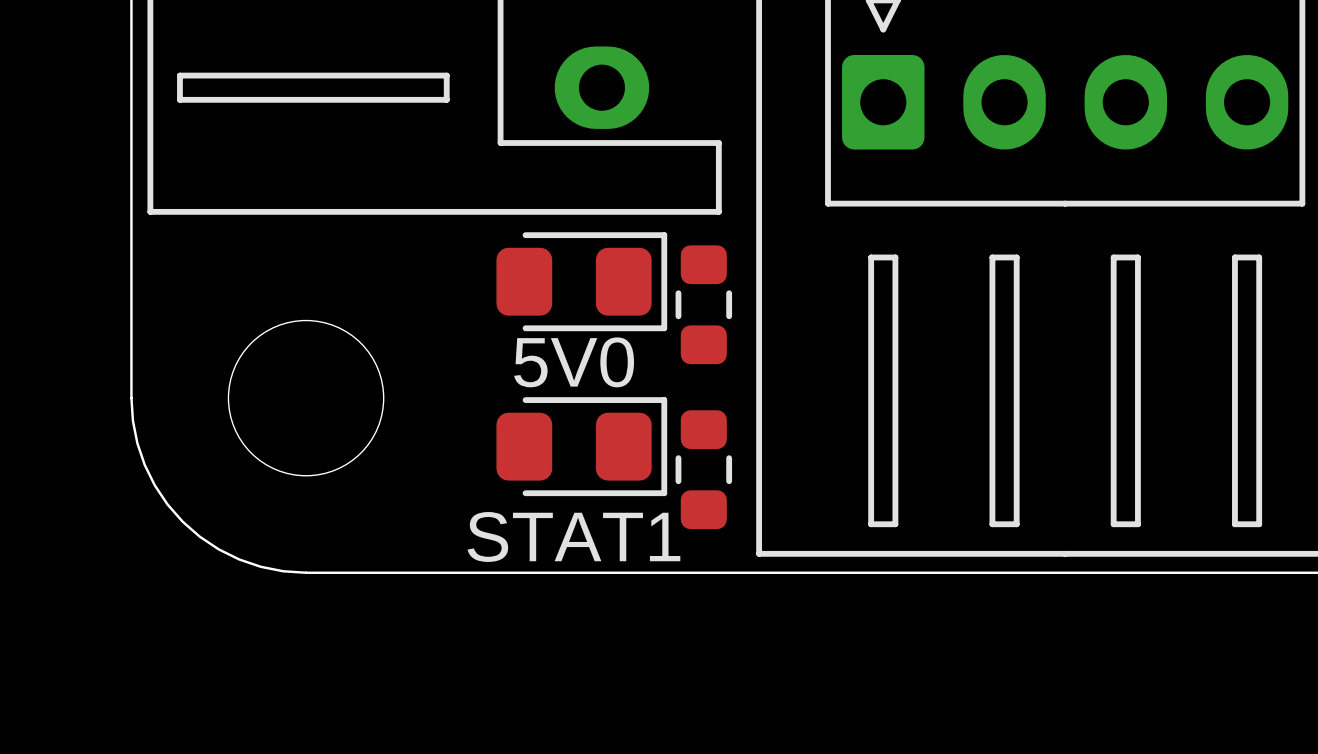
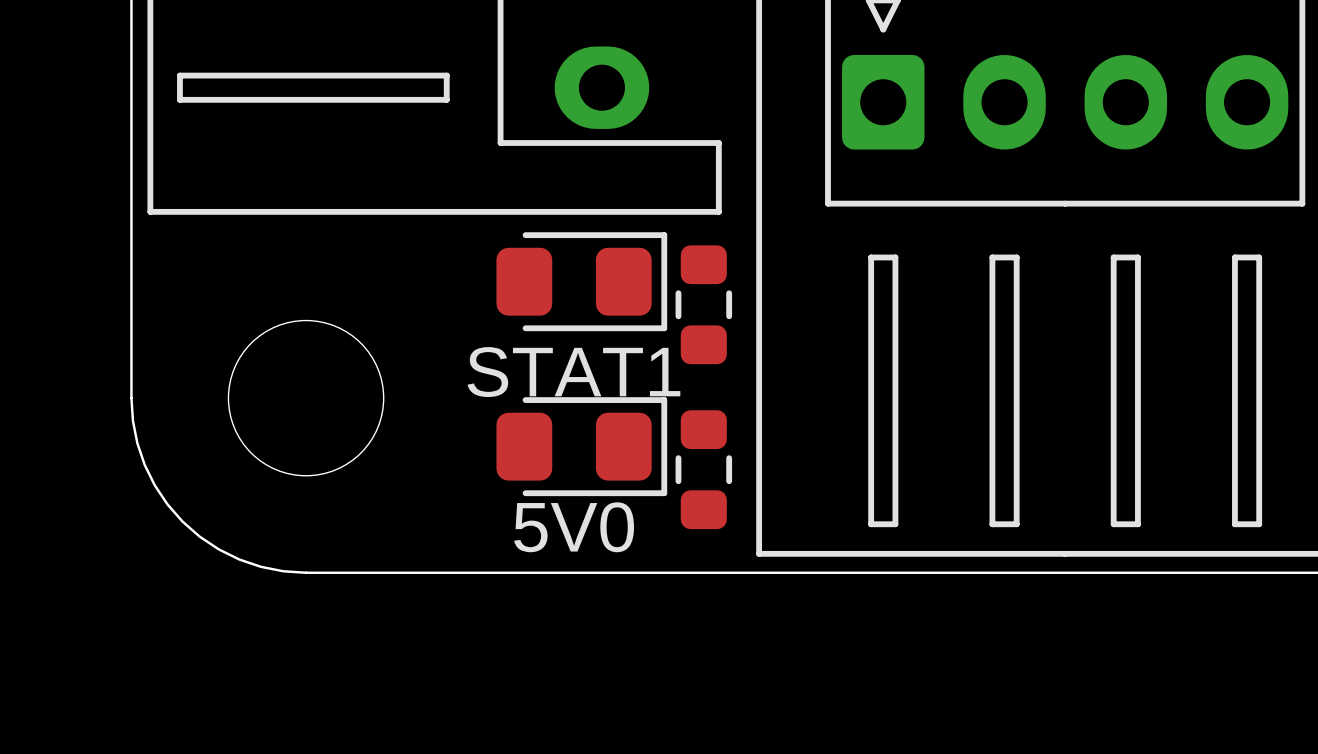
5V0 name: 5V0 (574, 362) -> STAT1 (573, 372)
STAT1 name: STAT1 (573, 536) -> 5V0 (574, 527)

